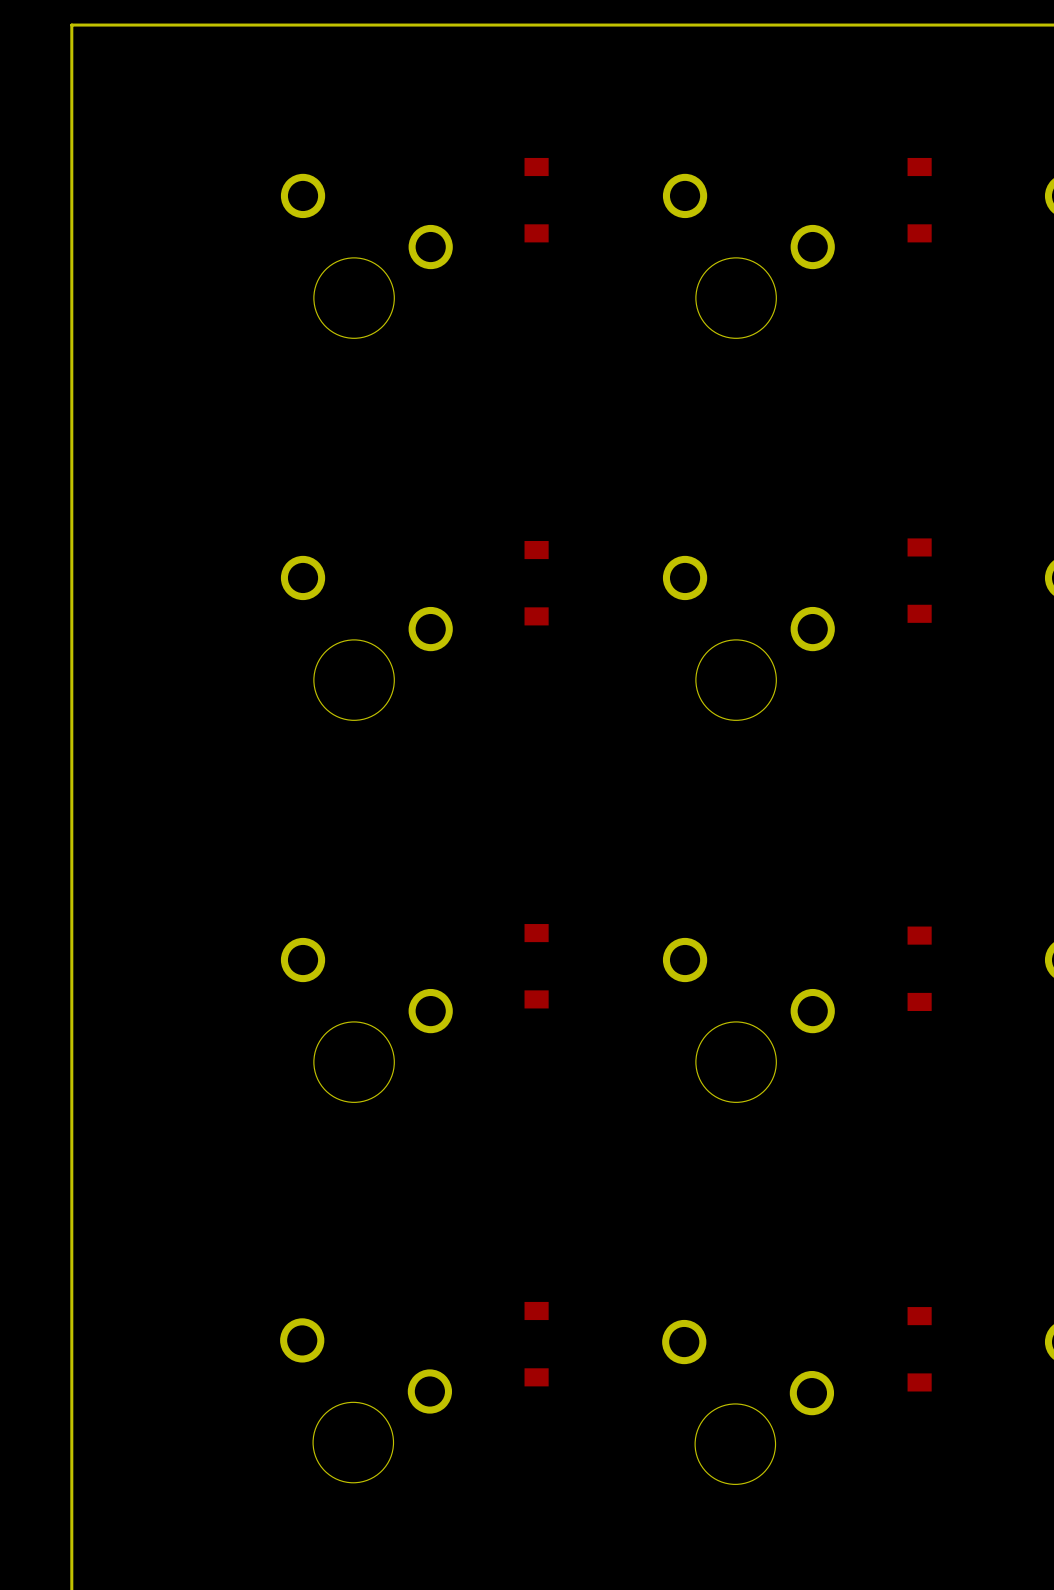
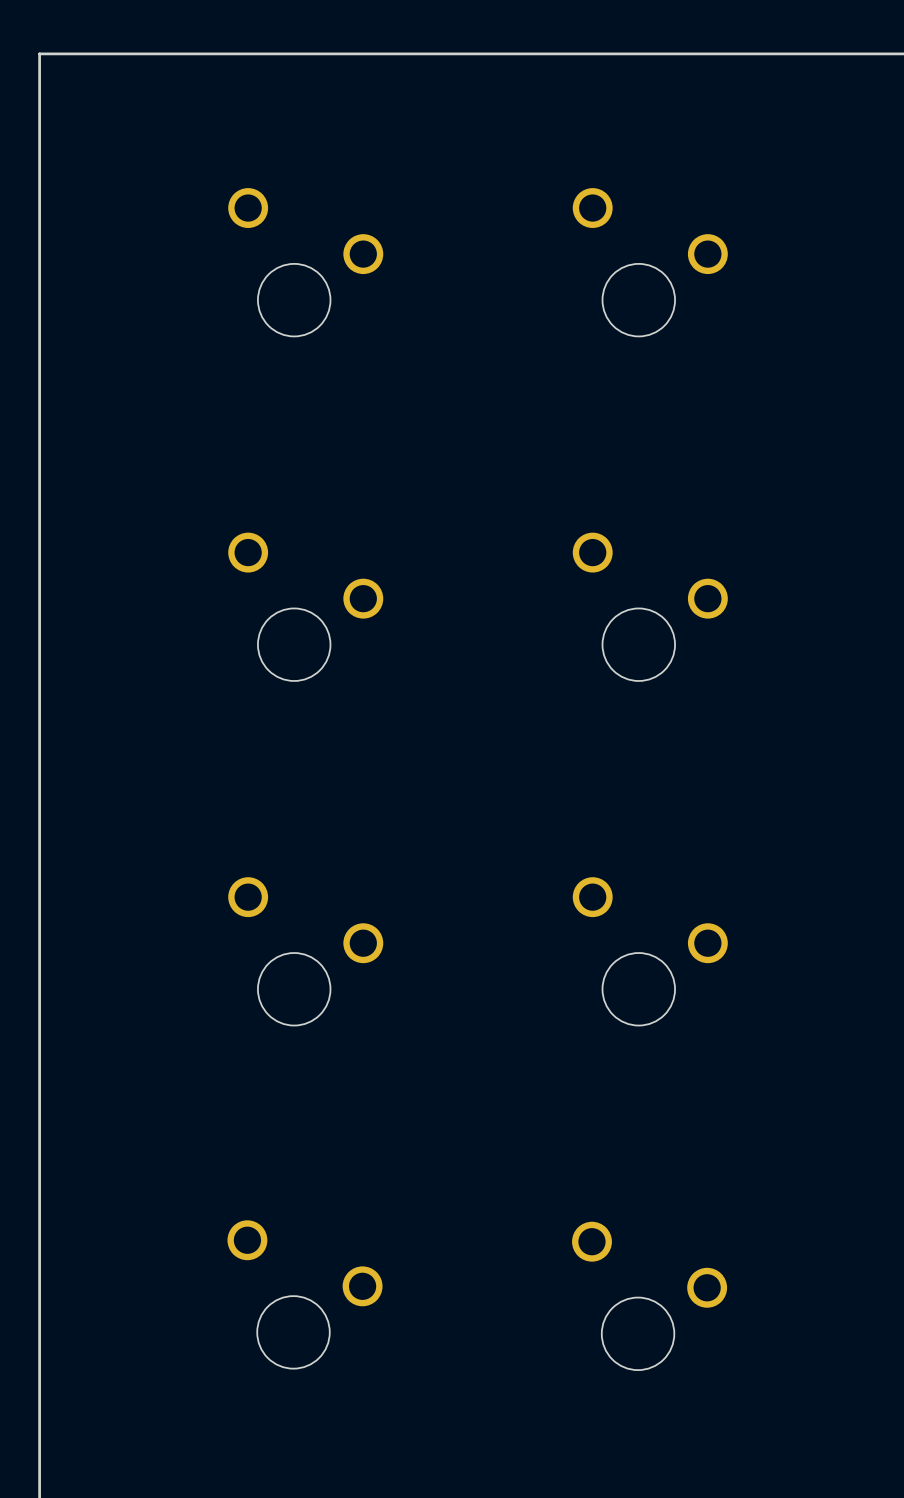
part: (536, 200) -> none
part: (919, 200) -> none
part: (919, 580) -> none
part: (536, 583) -> none
part: (536, 966) -> none
part: (919, 968) -> none
part: (536, 1344) -> none
part: (919, 1349) -> none

